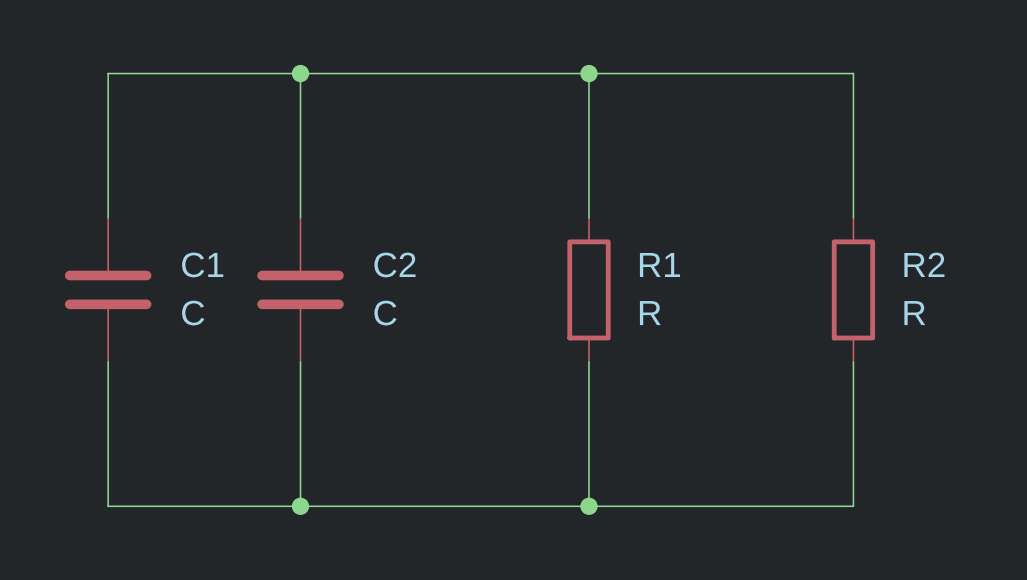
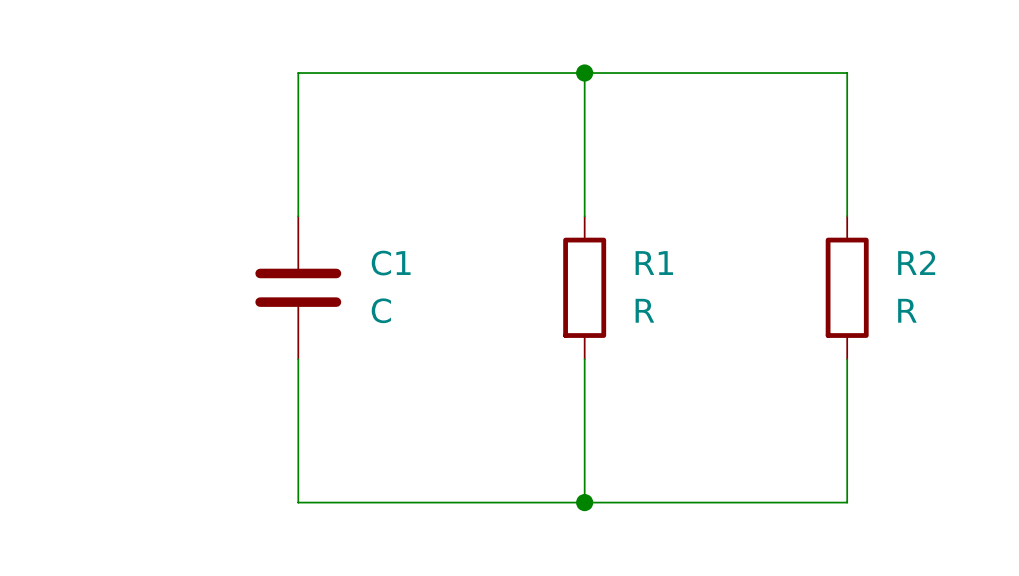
wire: (300, 73) (108, 73) (108, 217) -> none
junction: (300, 73) -> none
C2 name: C2 (394, 264) -> C1 (391, 263)
C1: C (108, 289) -> none
wire: (108, 362) (108, 506) (300, 506) -> none
junction: (300, 506) -> none

